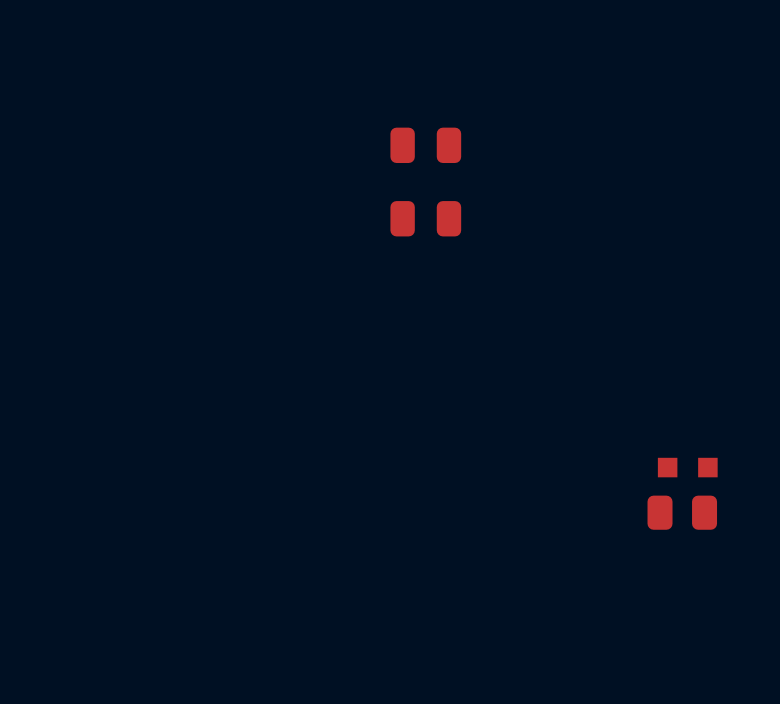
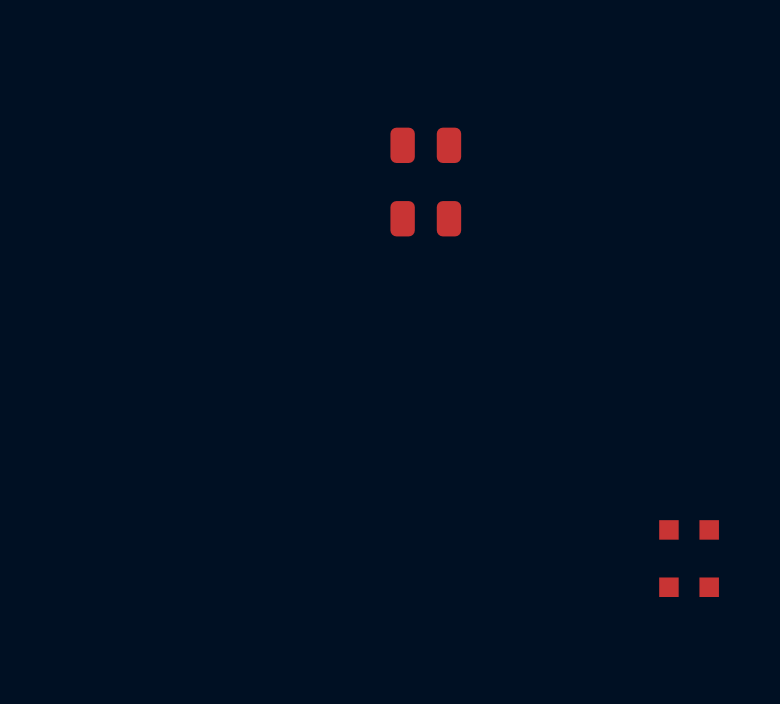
part position: (687, 467) -> (689, 587)
part footprint: [647, 495, 718, 530] -> [659, 520, 719, 540]

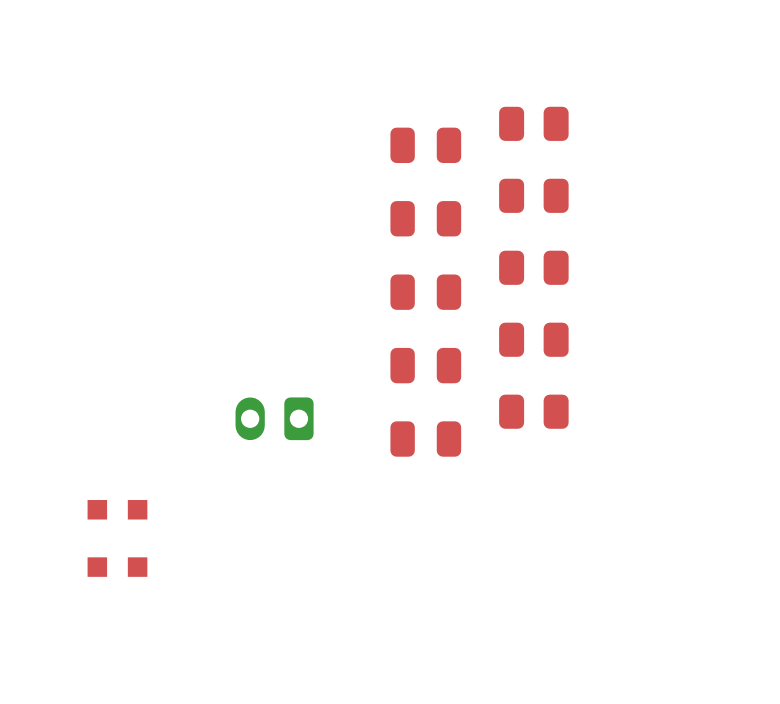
part: none -> (533, 123)
part: none -> (533, 195)
part: none -> (533, 267)
part: none -> (425, 292)
part: none -> (533, 339)
part: none -> (425, 365)
part: none -> (533, 411)
part: none -> (274, 418)
part: none -> (425, 439)
part: none -> (117, 509)
part: (689, 529) -> none
part: none -> (117, 567)
part: (689, 587) -> none

